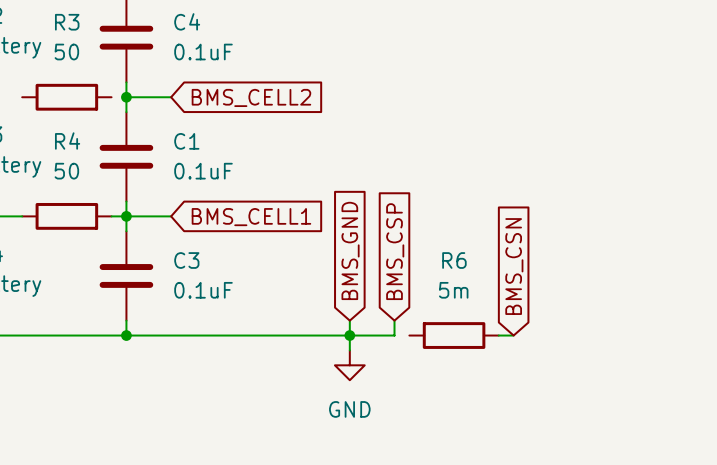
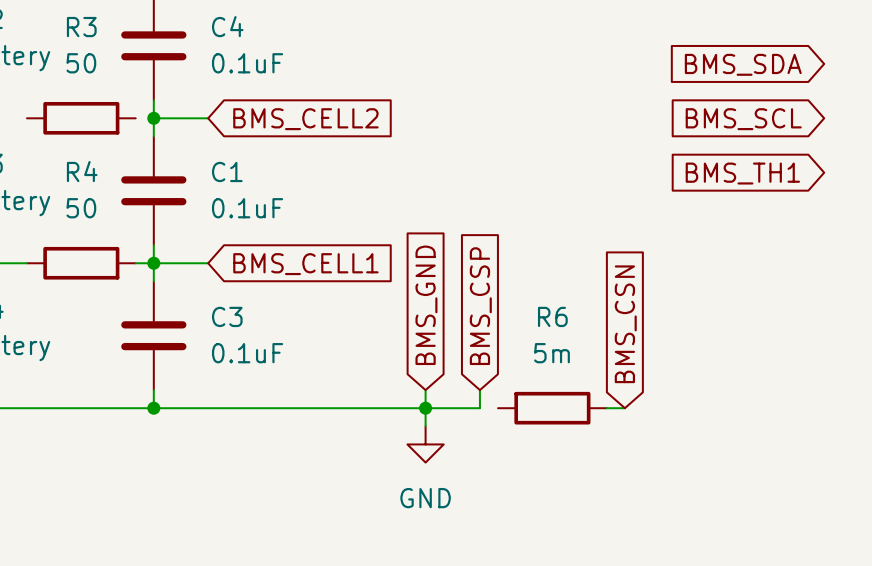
global label: none -> BMS_SDA (743, 64)
global label: none -> BMS_SCL (743, 119)
global label: none -> BMS_TH1 (742, 173)

